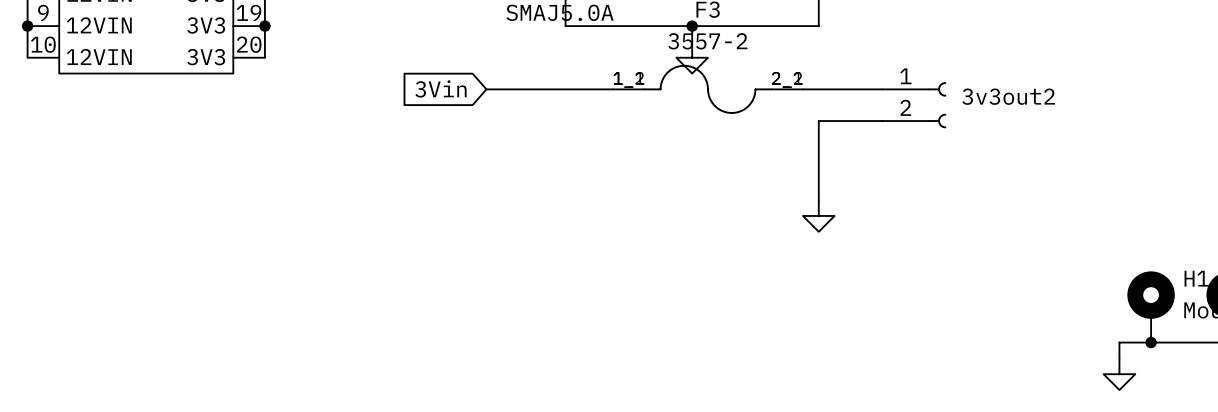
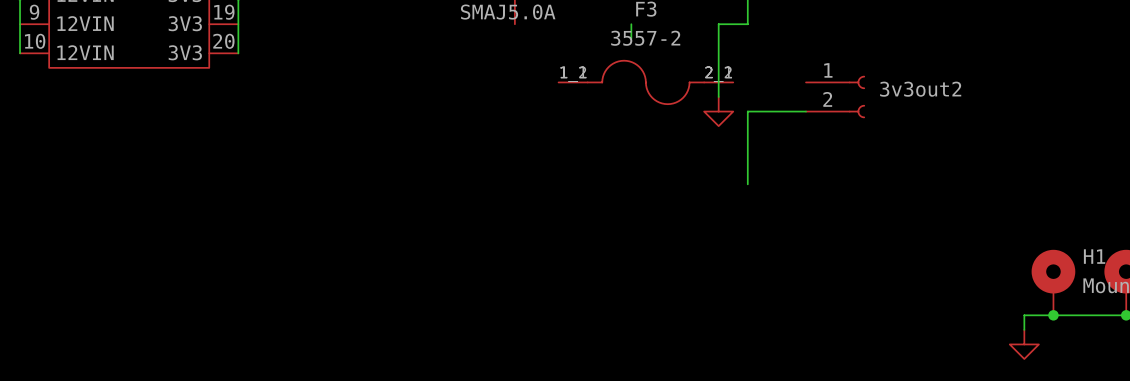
junction: (27, 26) -> none
junction: (264, 26) -> none
wire: (565, 26) (787, 26) -> (718, 96) (718, 24)
junction: (692, 26) -> none
power symbol: (692, 57) -> none
global label: 3Vin (440, 88) -> none
wire: (486, 89) (613, 89) -> none
wire: (802, 89) (882, 89) -> none
power symbol: none -> (718, 111)
power symbol: (818, 215) -> none

